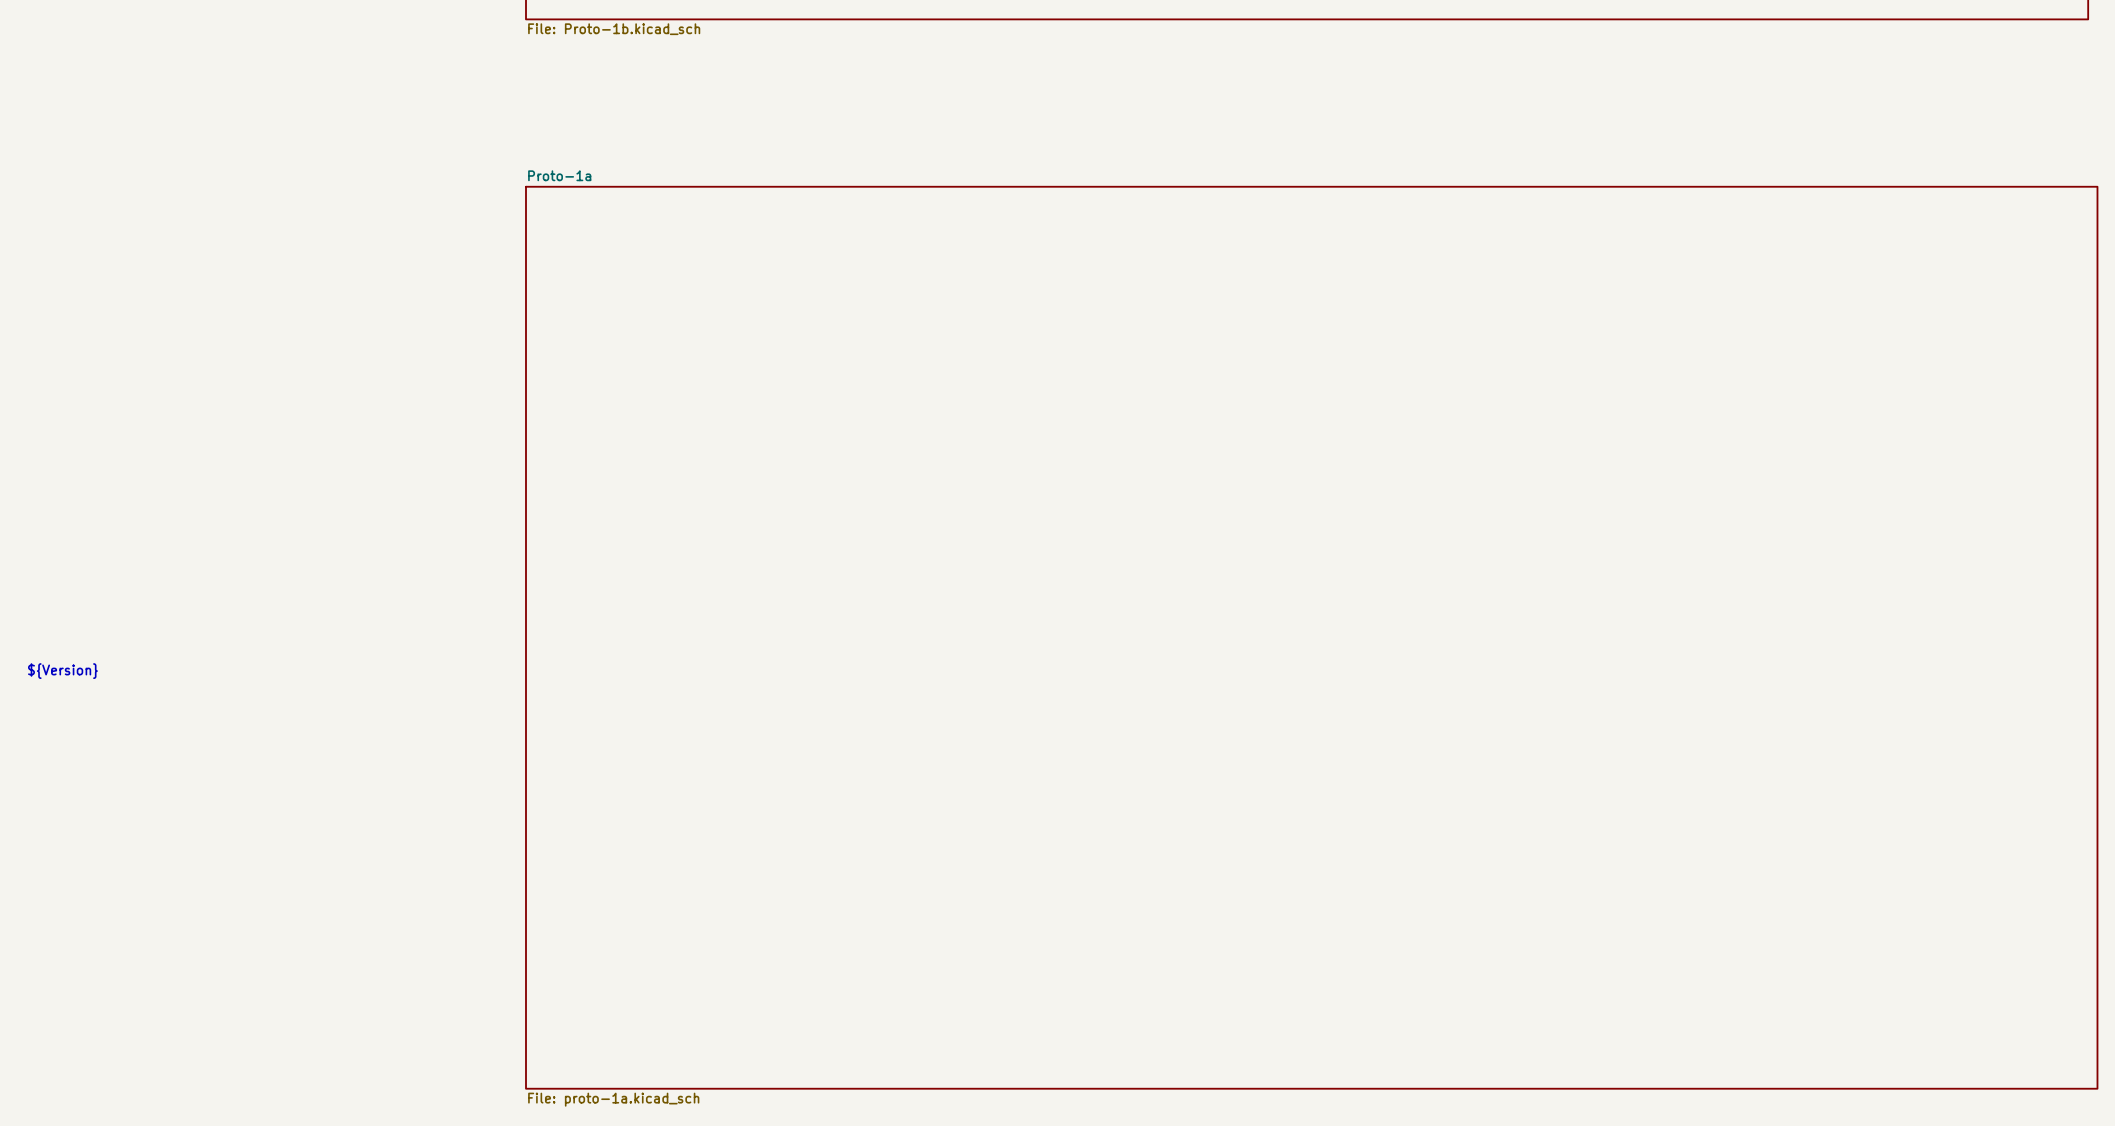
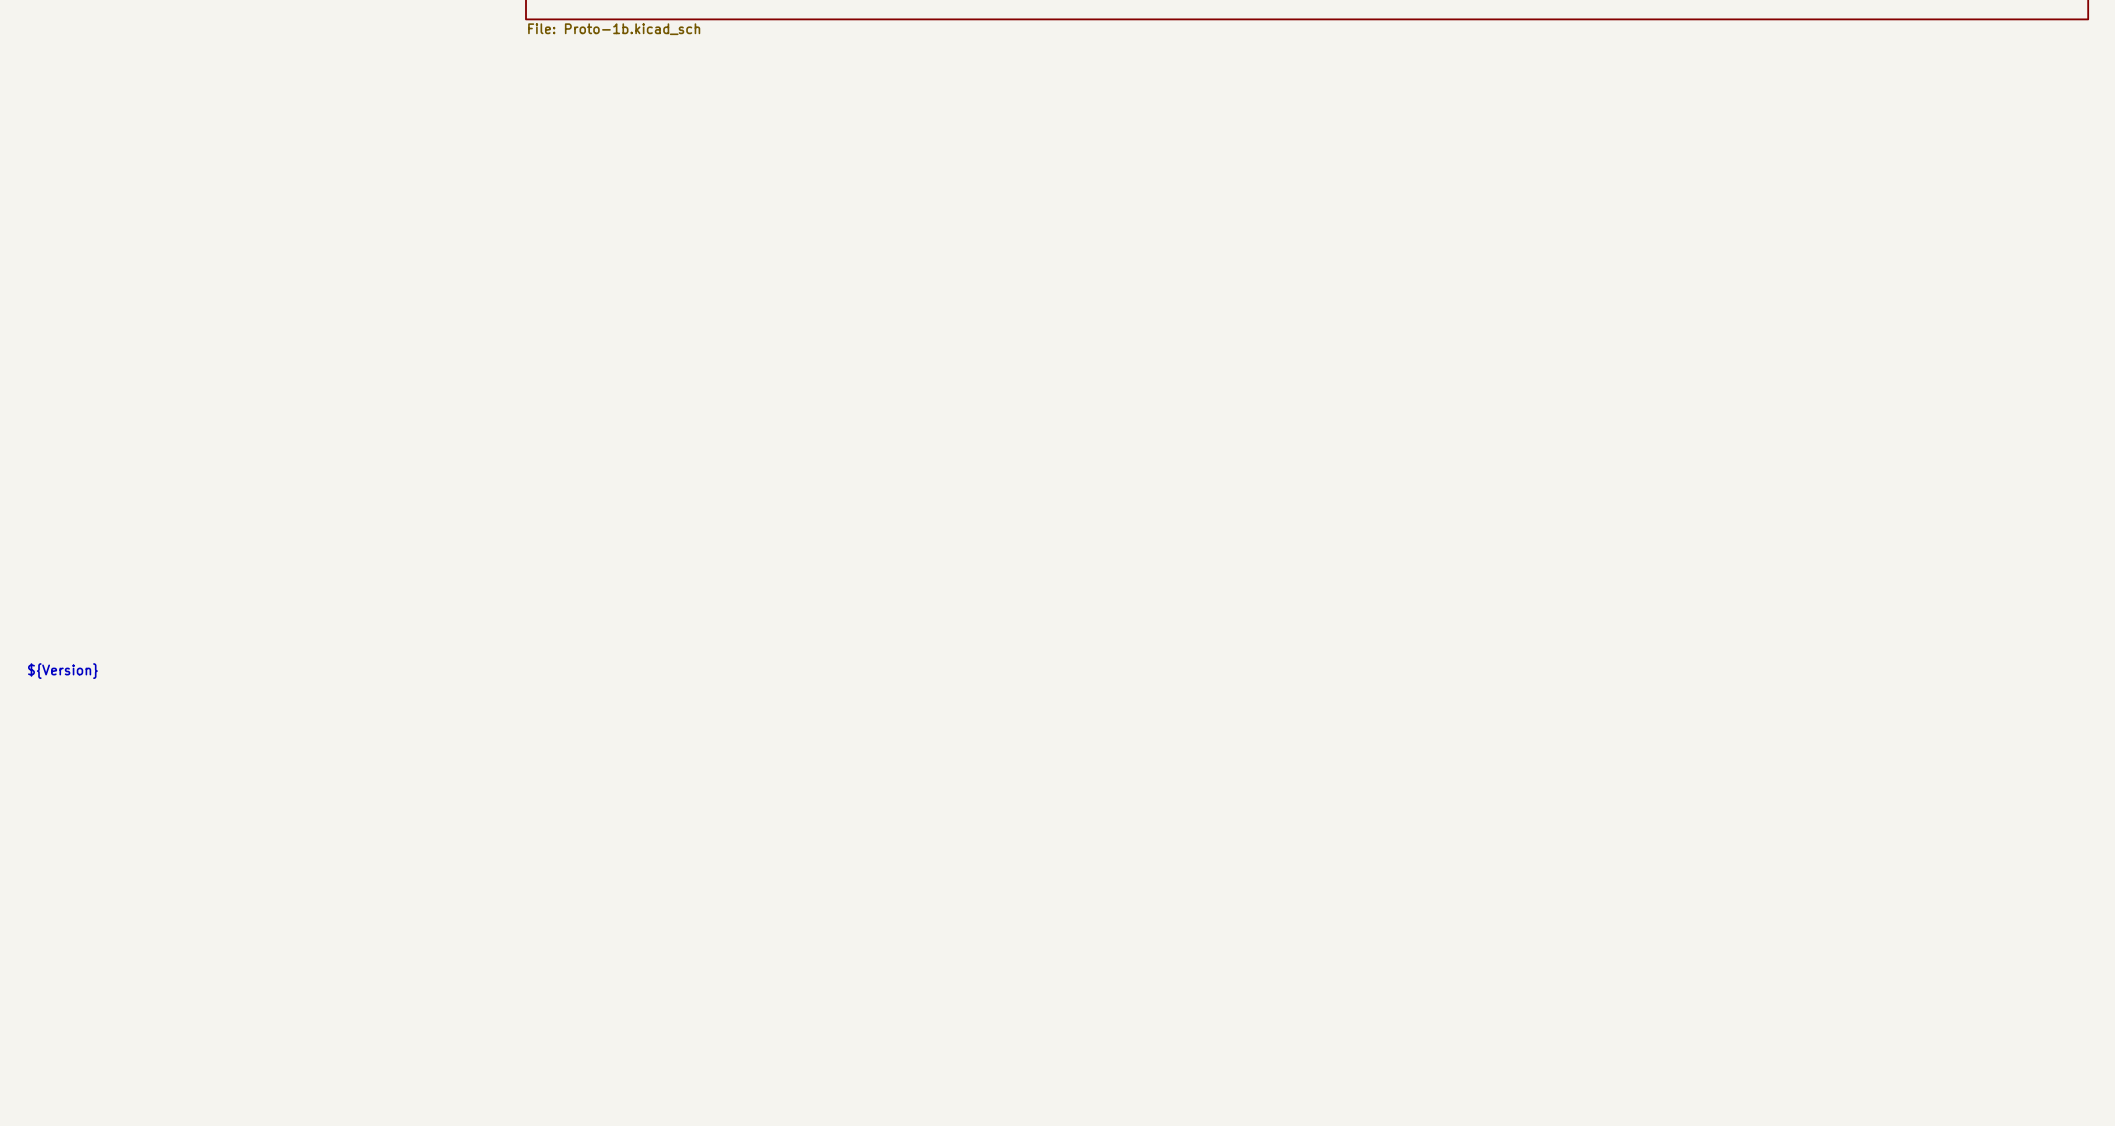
sheet Proto-1a: File: proto-1a.kicad_sch (1311, 637) -> none

